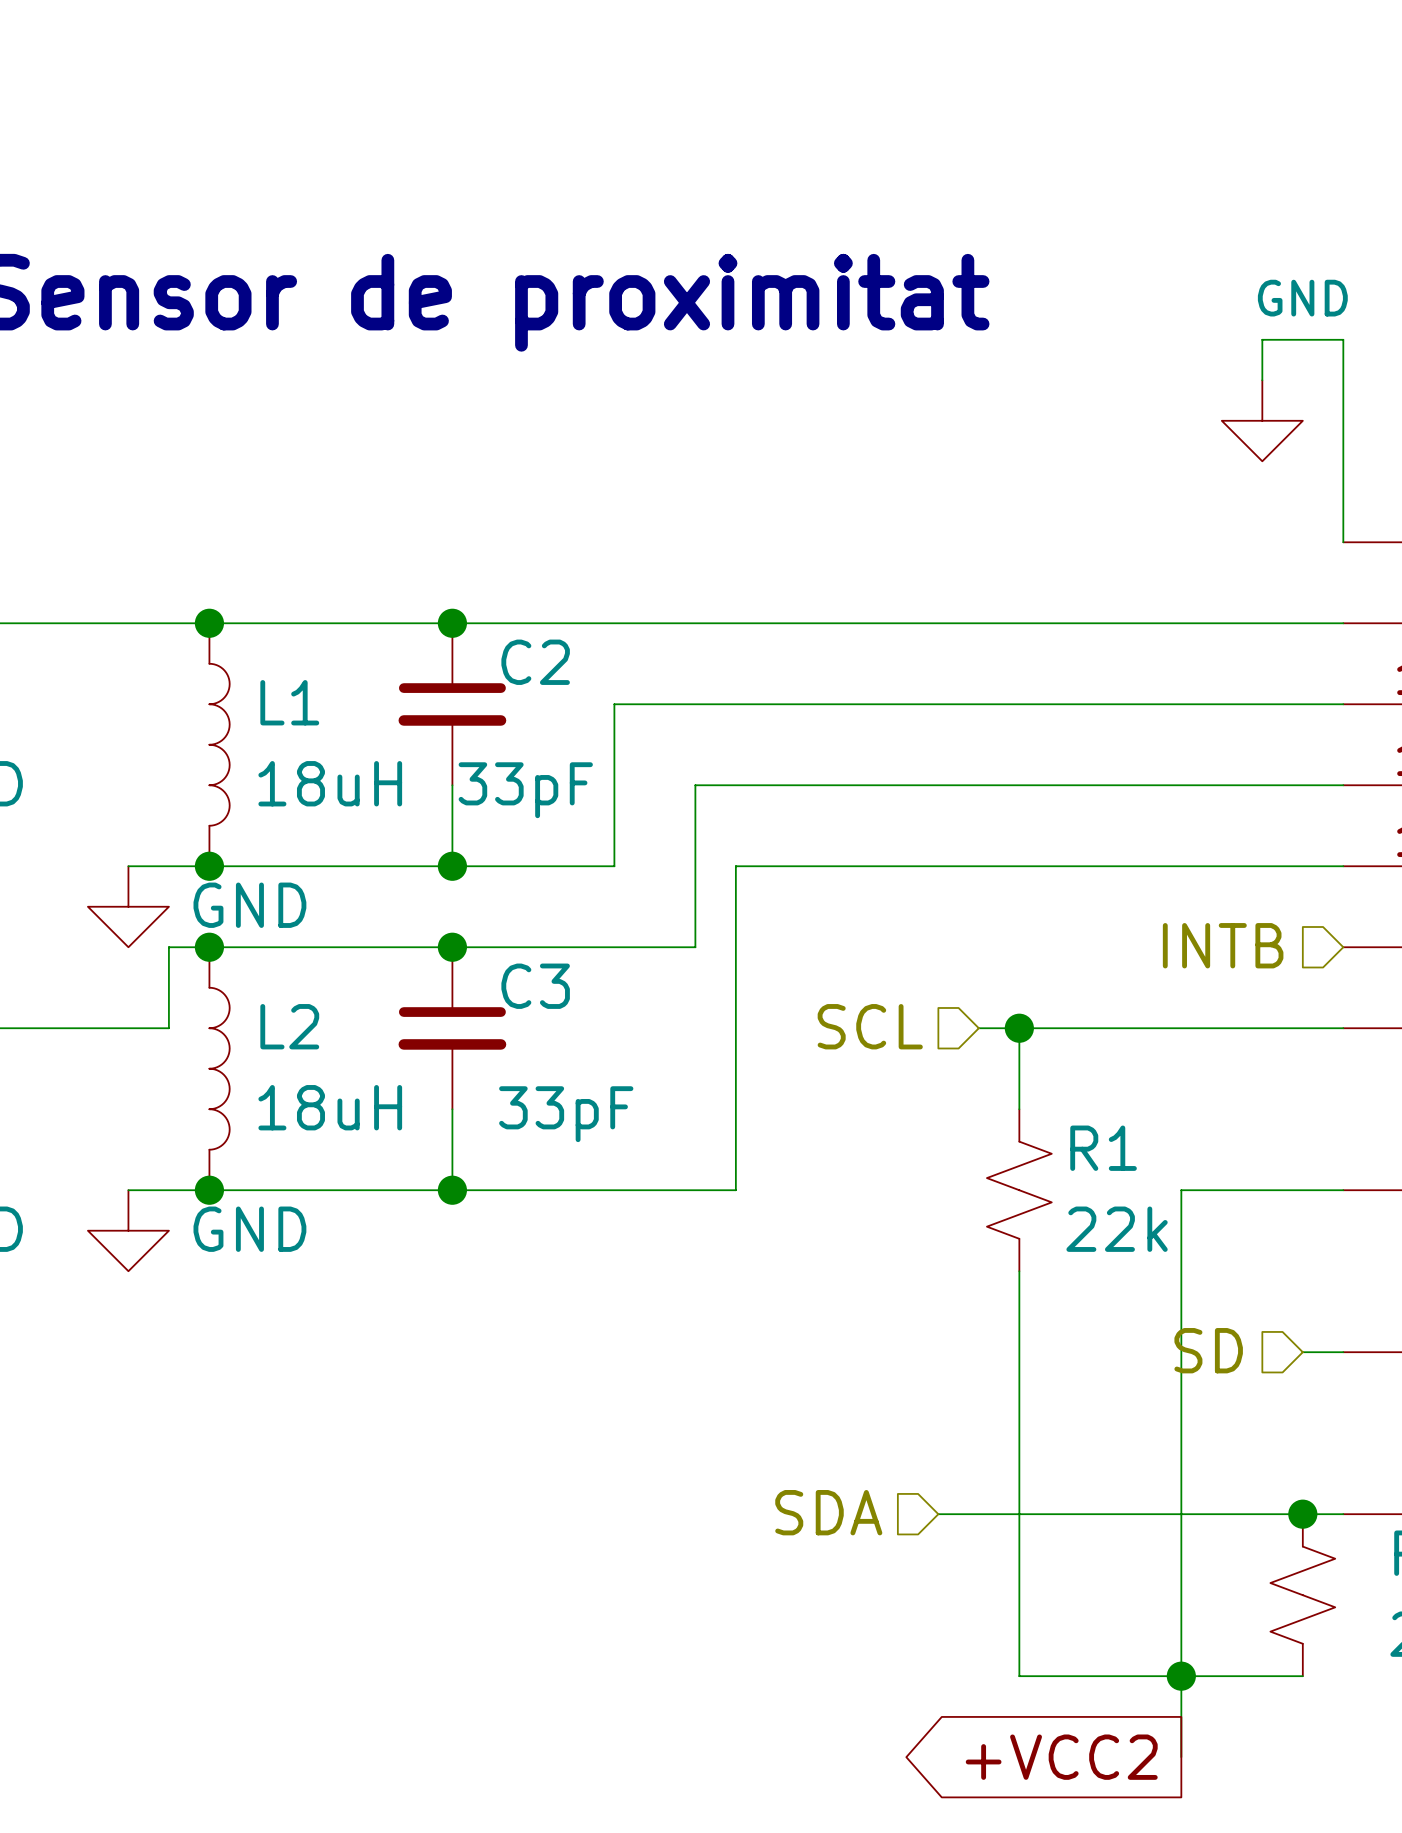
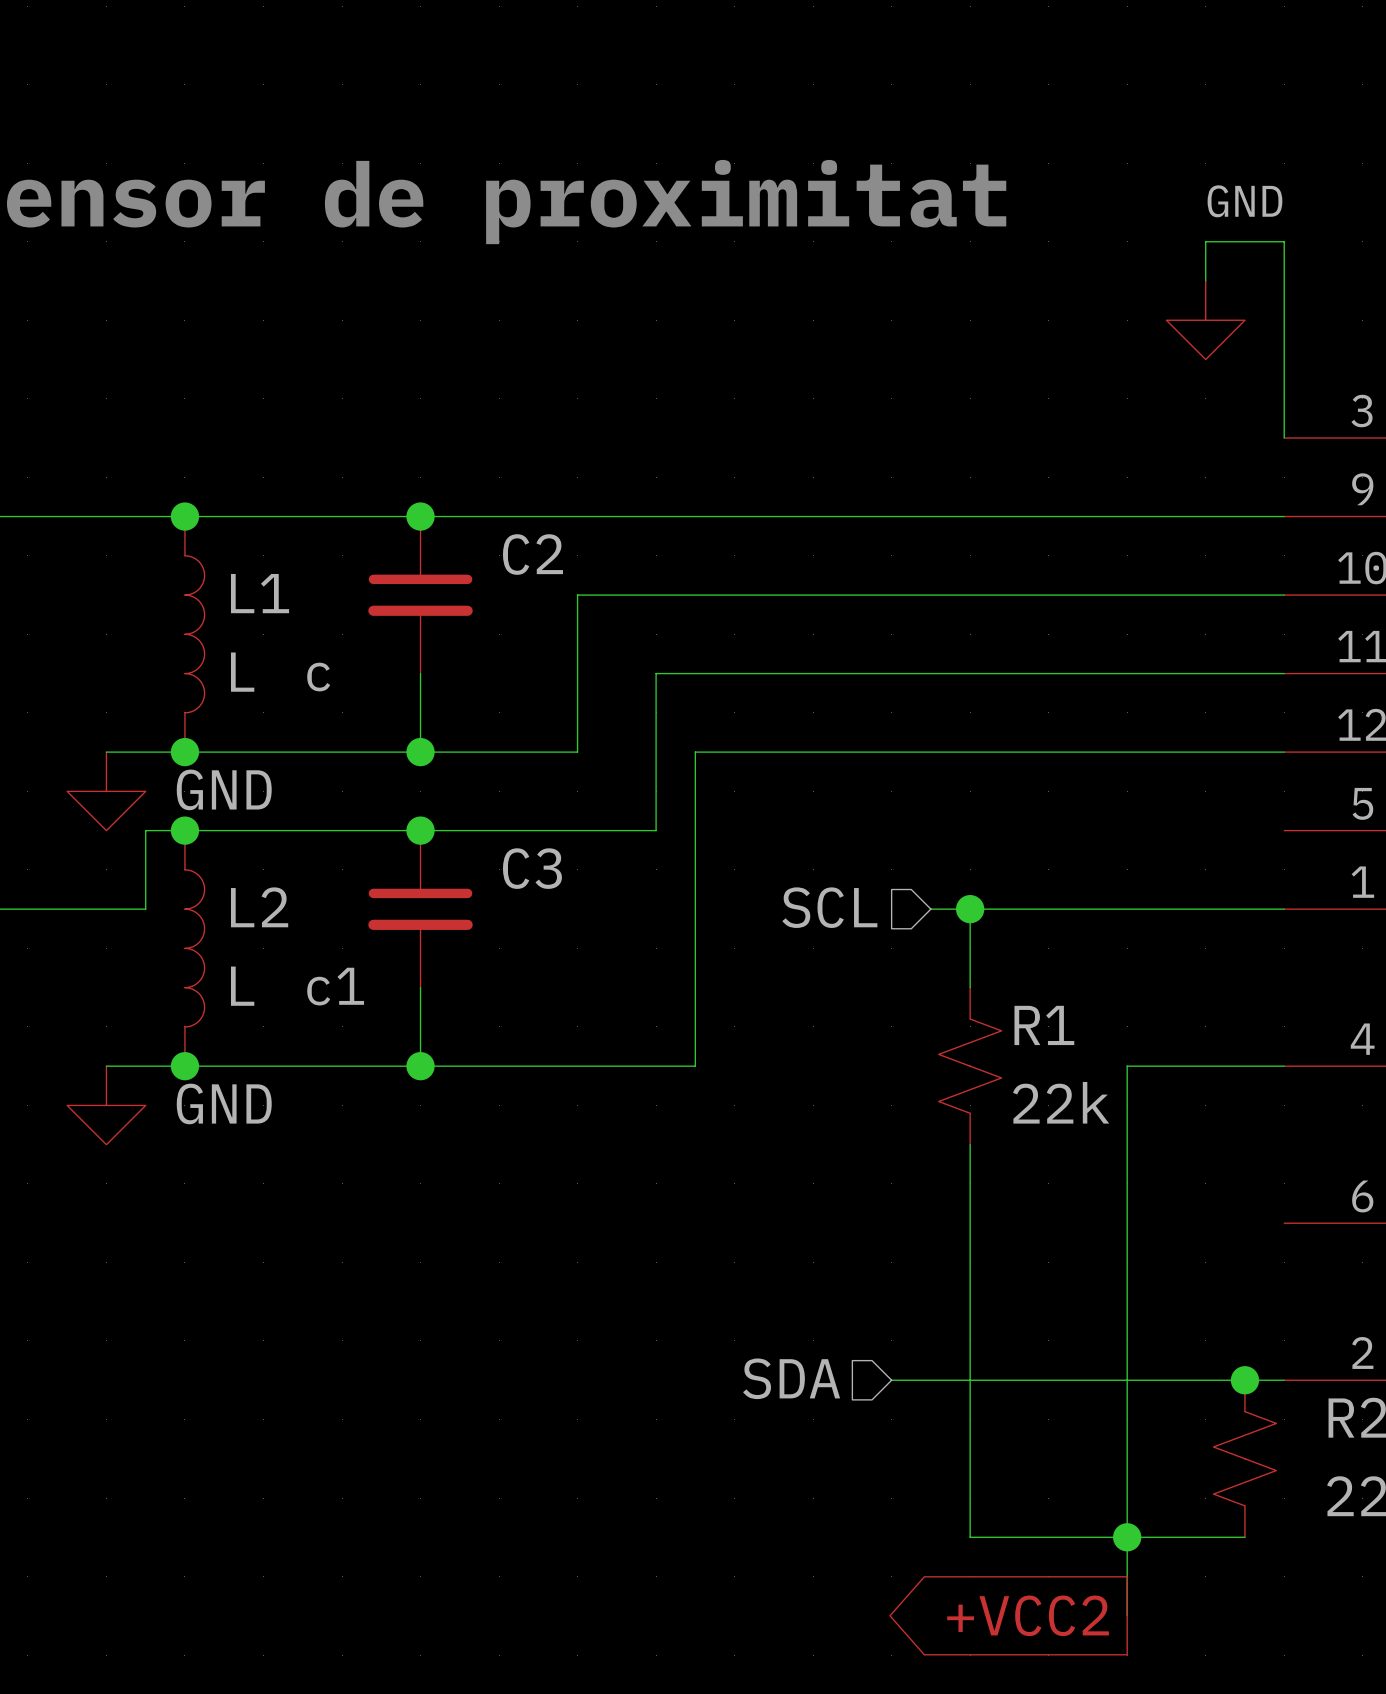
C2 name position: C2 (535, 662) -> C2 (532, 554)
L1 value: 18uH (330, 783) -> L (242, 672)
C2 value: 33pF (525, 790) -> c (318, 677)
hierarchical label: INTB (1223, 945) -> none
C3 name position: C3 (535, 986) -> C3 (532, 868)
L2 value: 18uH (330, 1107) -> L (242, 986)
C3 value: 33pF (566, 1114) -> c1 (335, 986)
hierarchical label: SD (1208, 1350) -> none
wire: (1302, 1352) (1343, 1352) -> none

